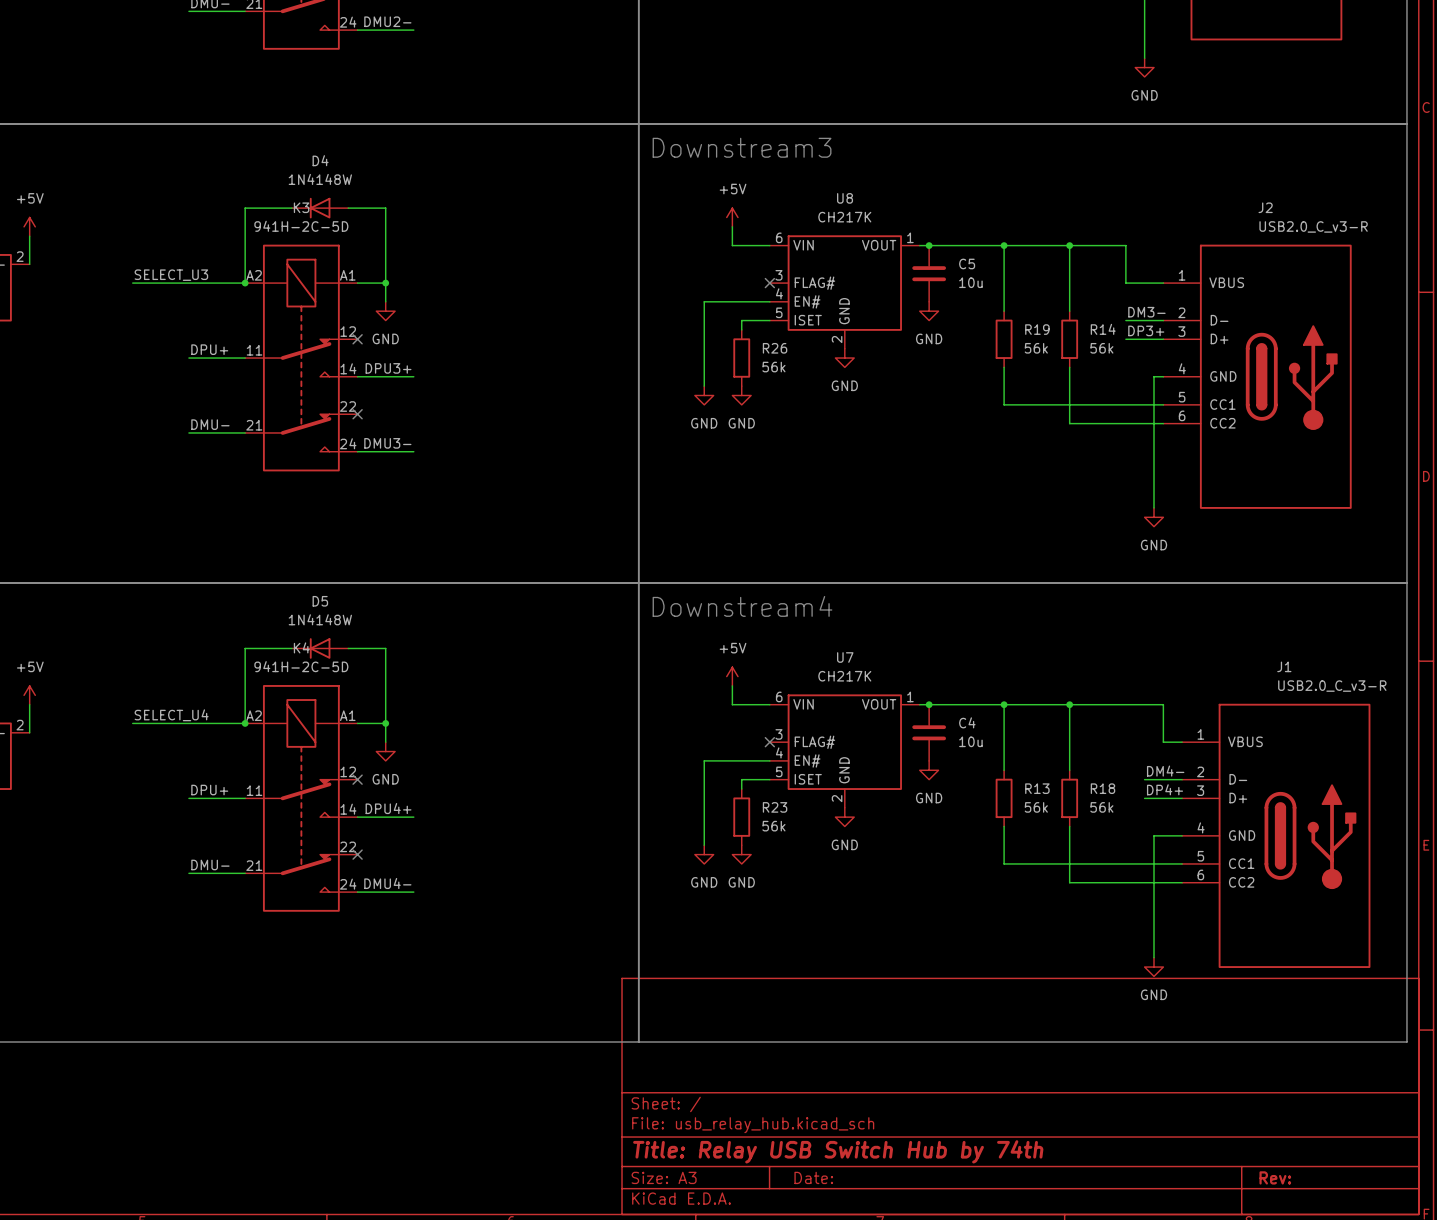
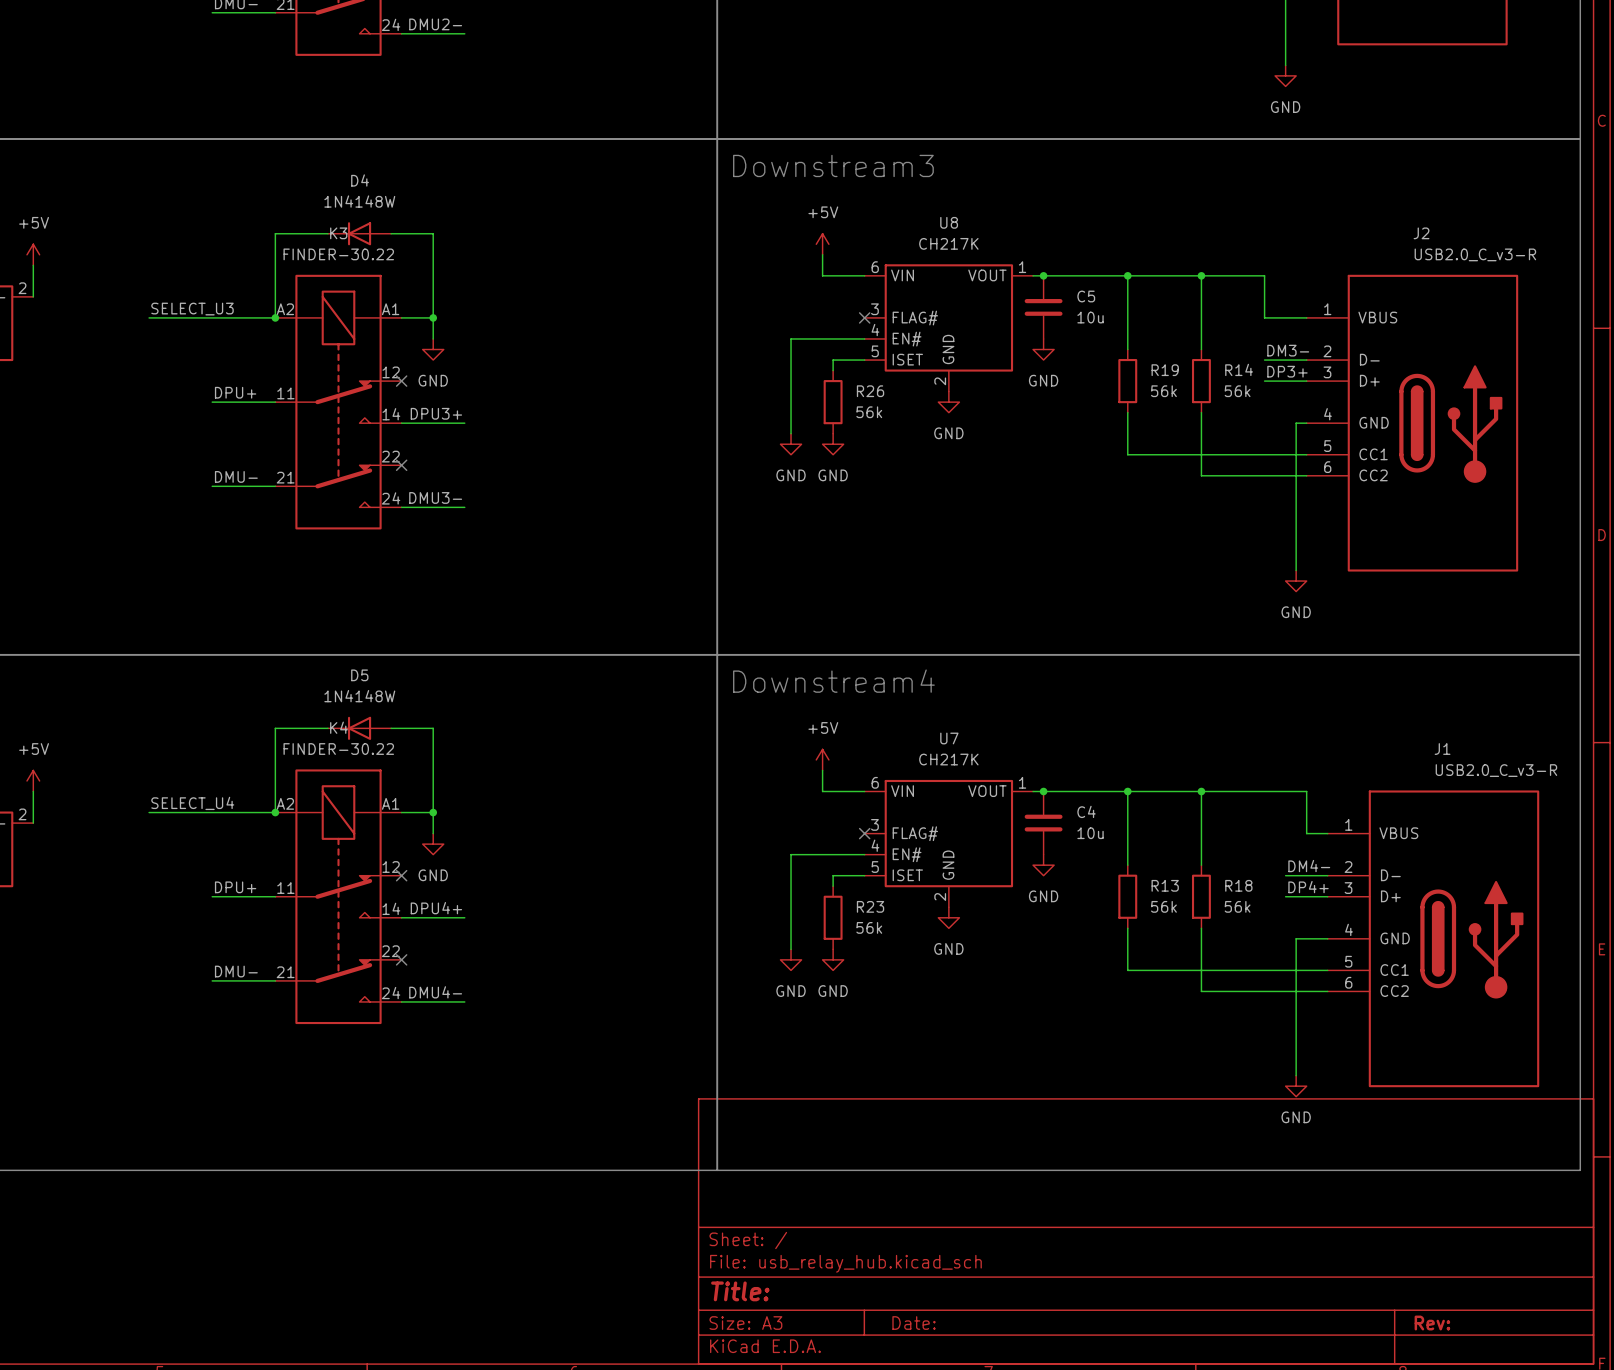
K3 value: 941H-2C-5D (301, 226) -> FINDER-30.22 (338, 254)
K4 value: 941H-2C-5D (301, 666) -> FINDER-30.22 (338, 749)
title block: Title: Relay USB Switch Hub by 74th (838, 1151) -> Title: (740, 1291)

